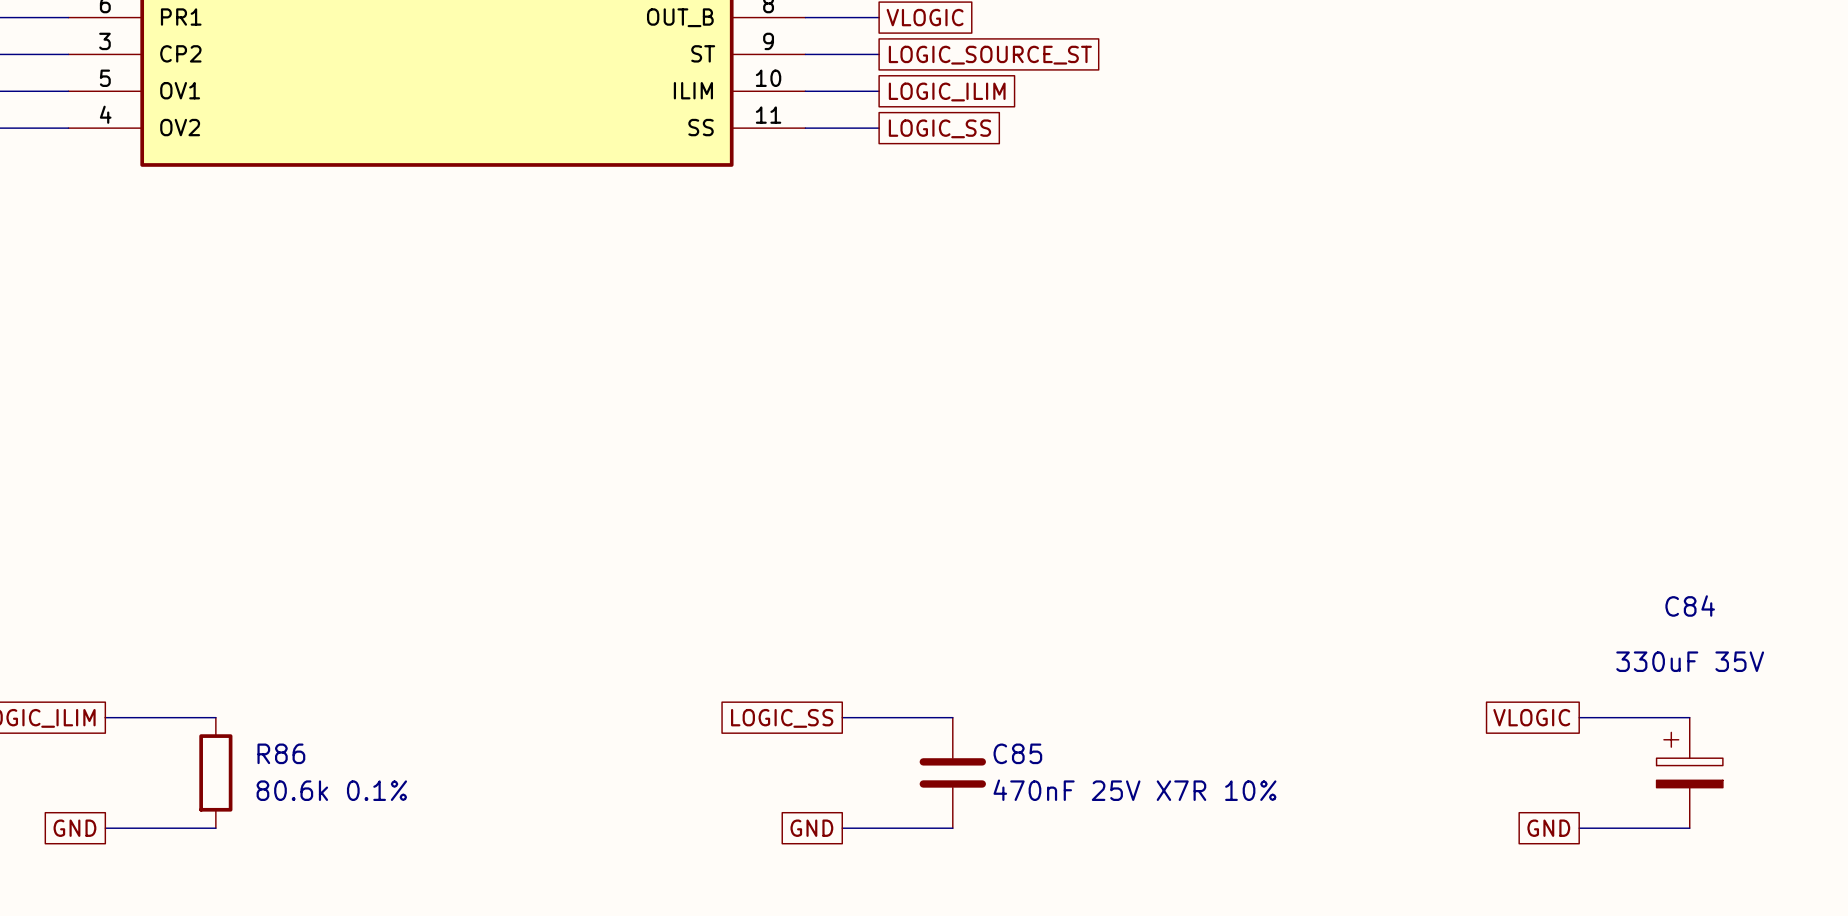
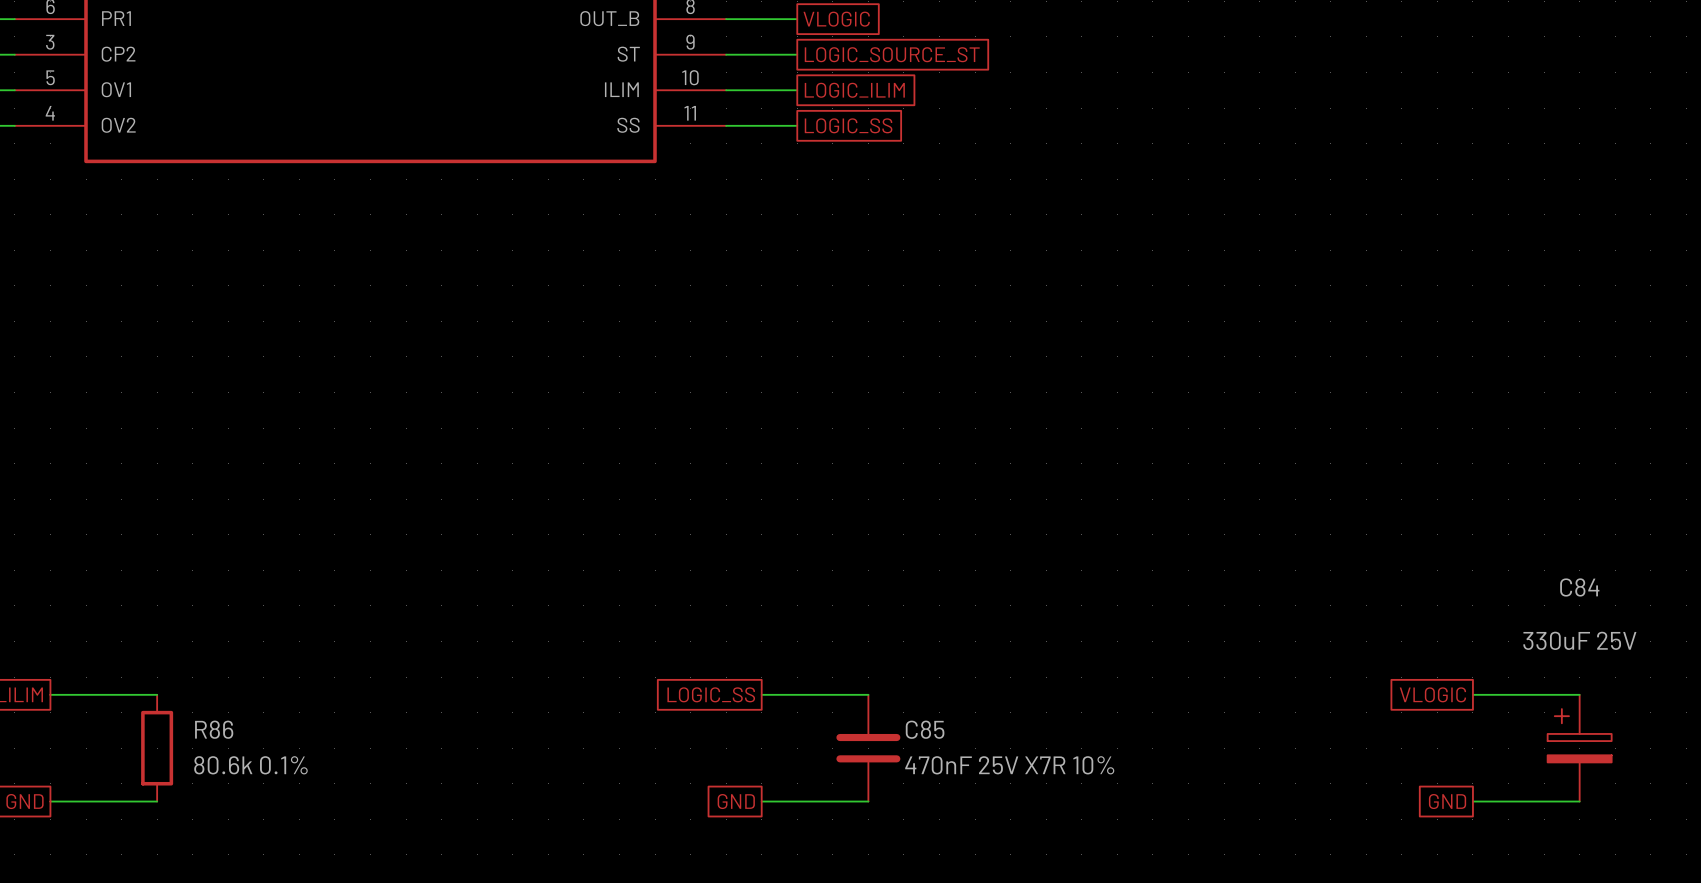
C84 value: 330uF 35V (1690, 661) -> 330uF 25V (1579, 640)

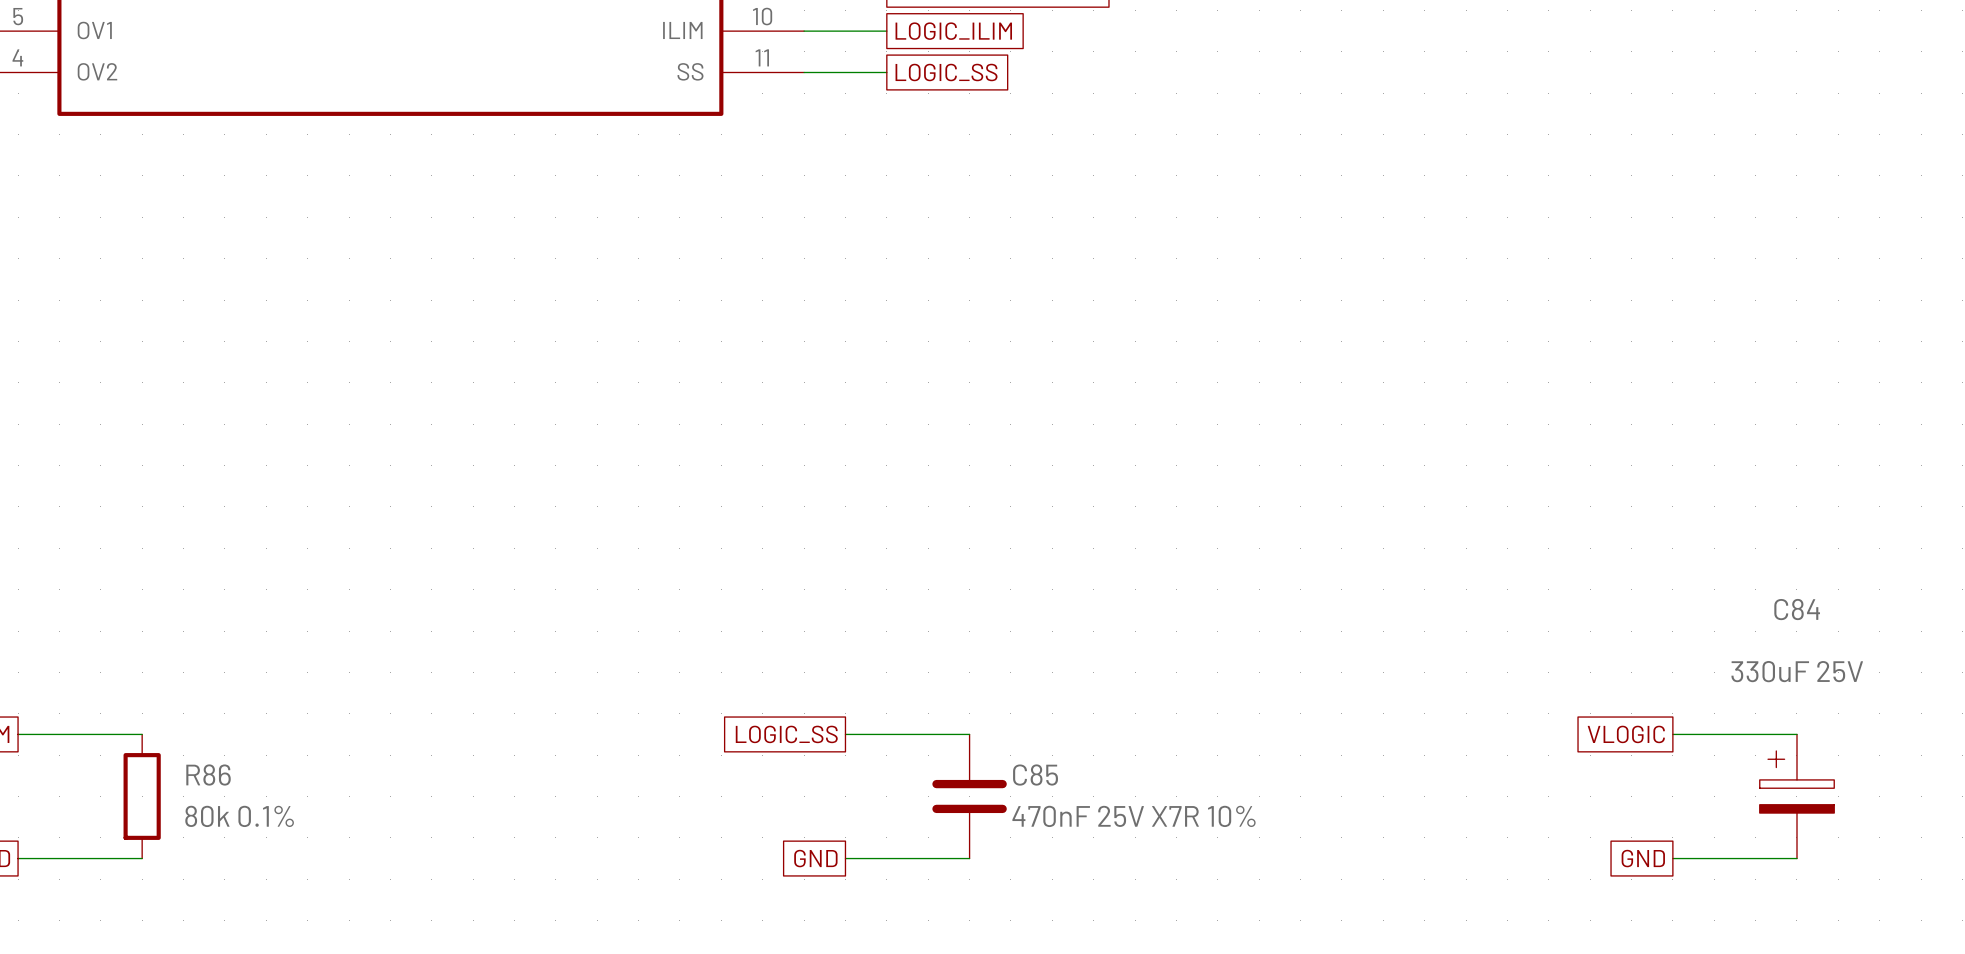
R86 value: 80.6k 0.1% (250, 765) -> 80k 0.1% (239, 816)

